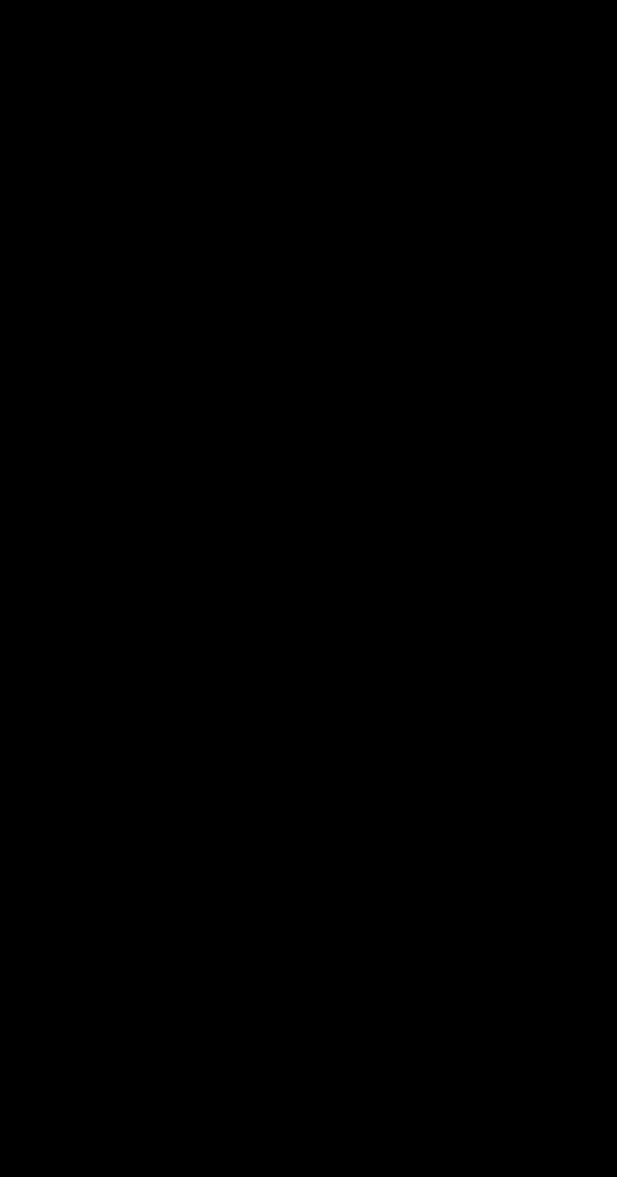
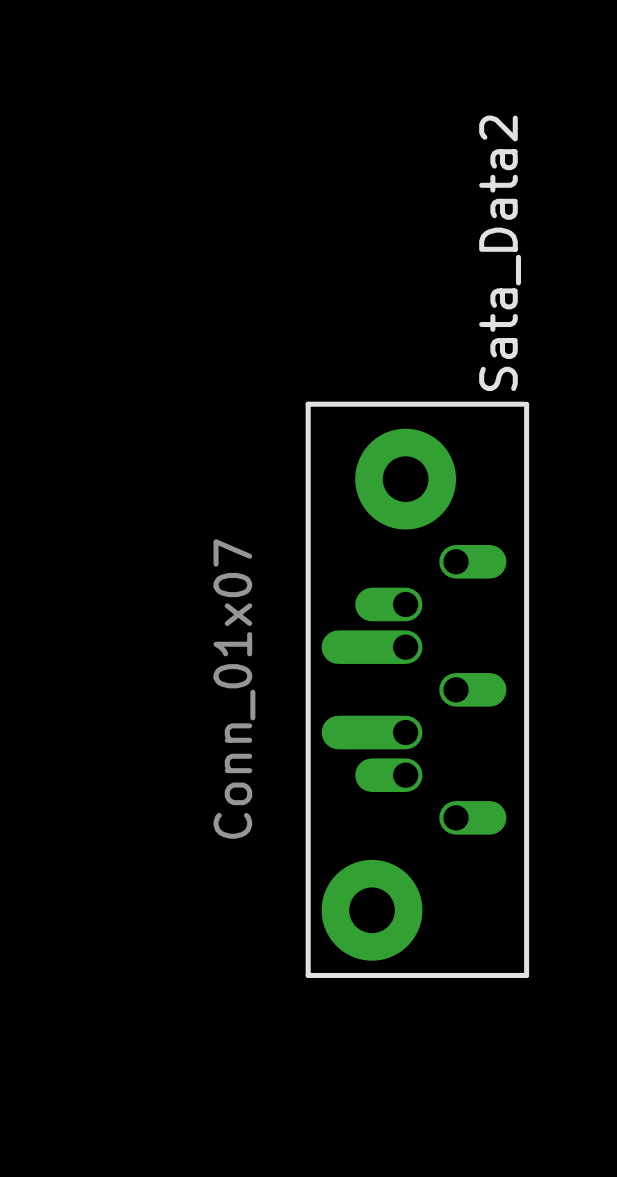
Sata_Data2: none -> Conn_01x07 (417, 689)

